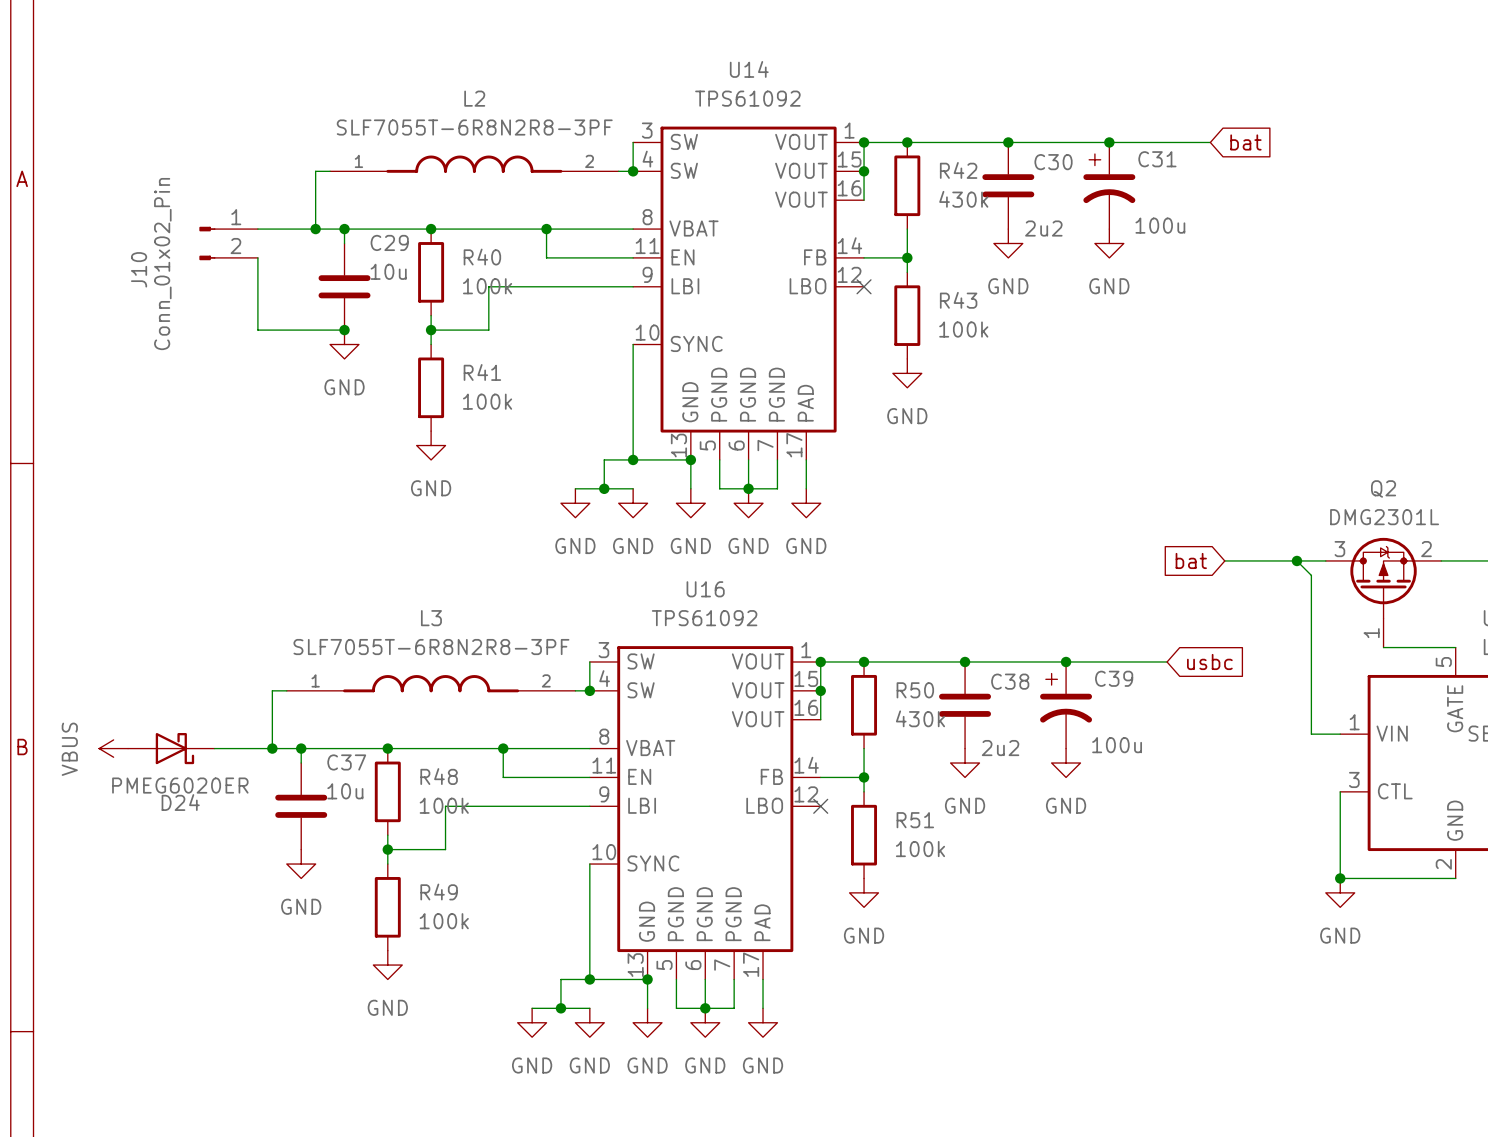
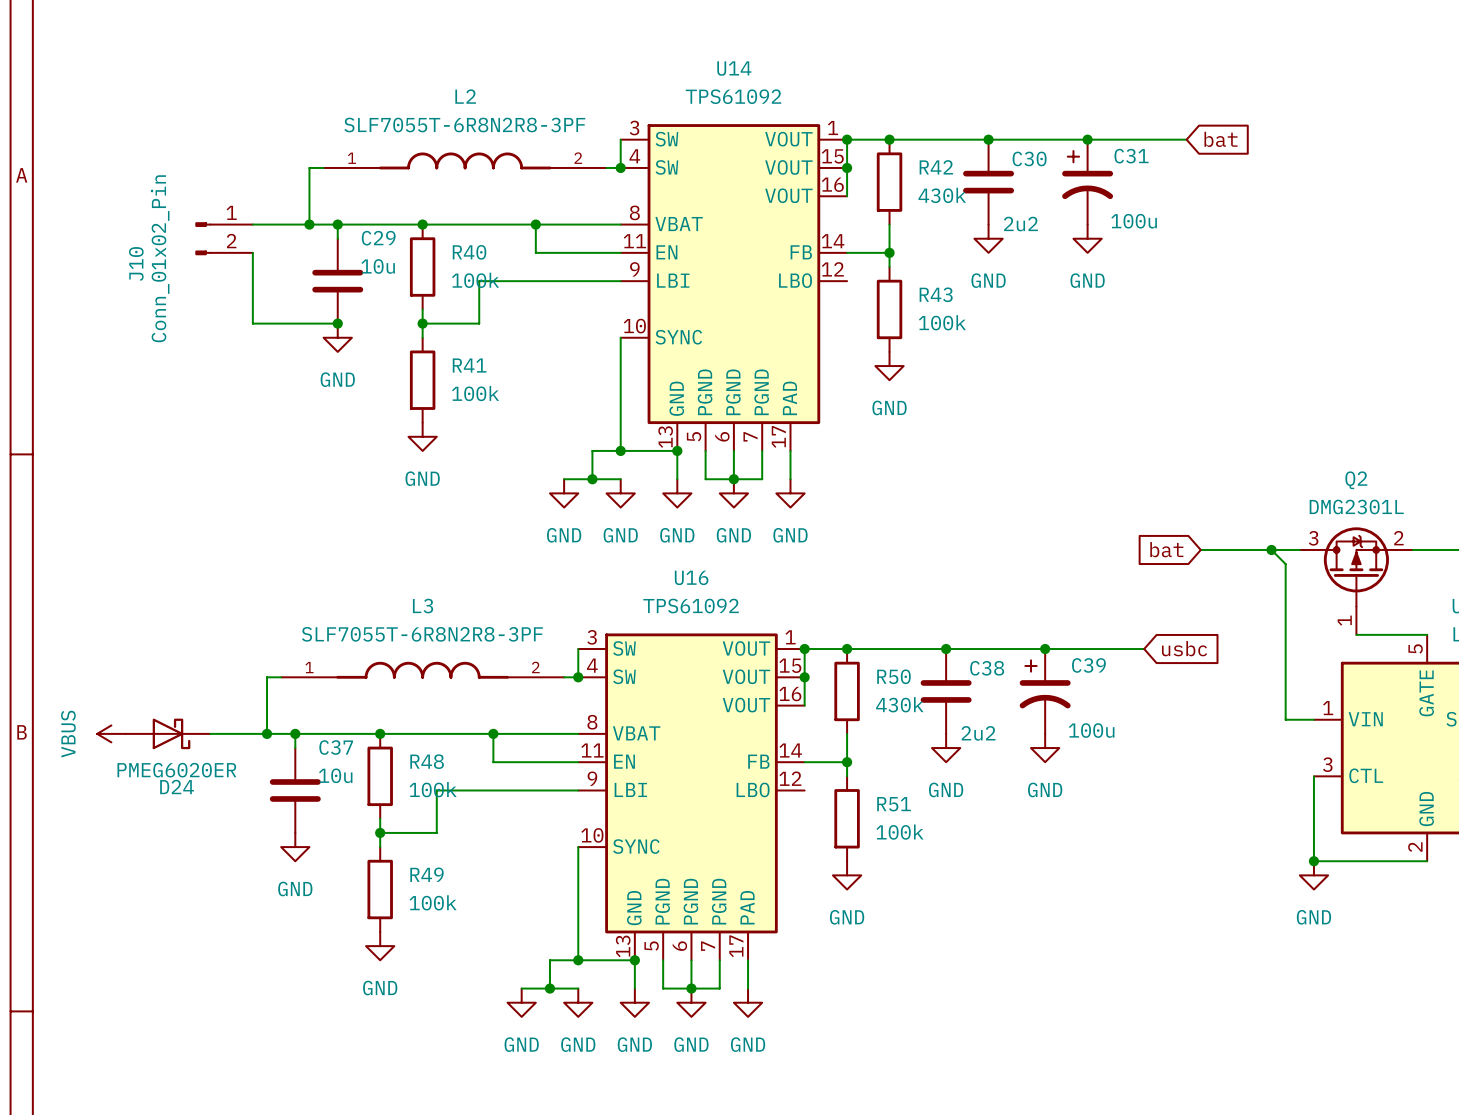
no-connect mark: (864, 286) -> none
no-connect mark: (820, 806) -> none

